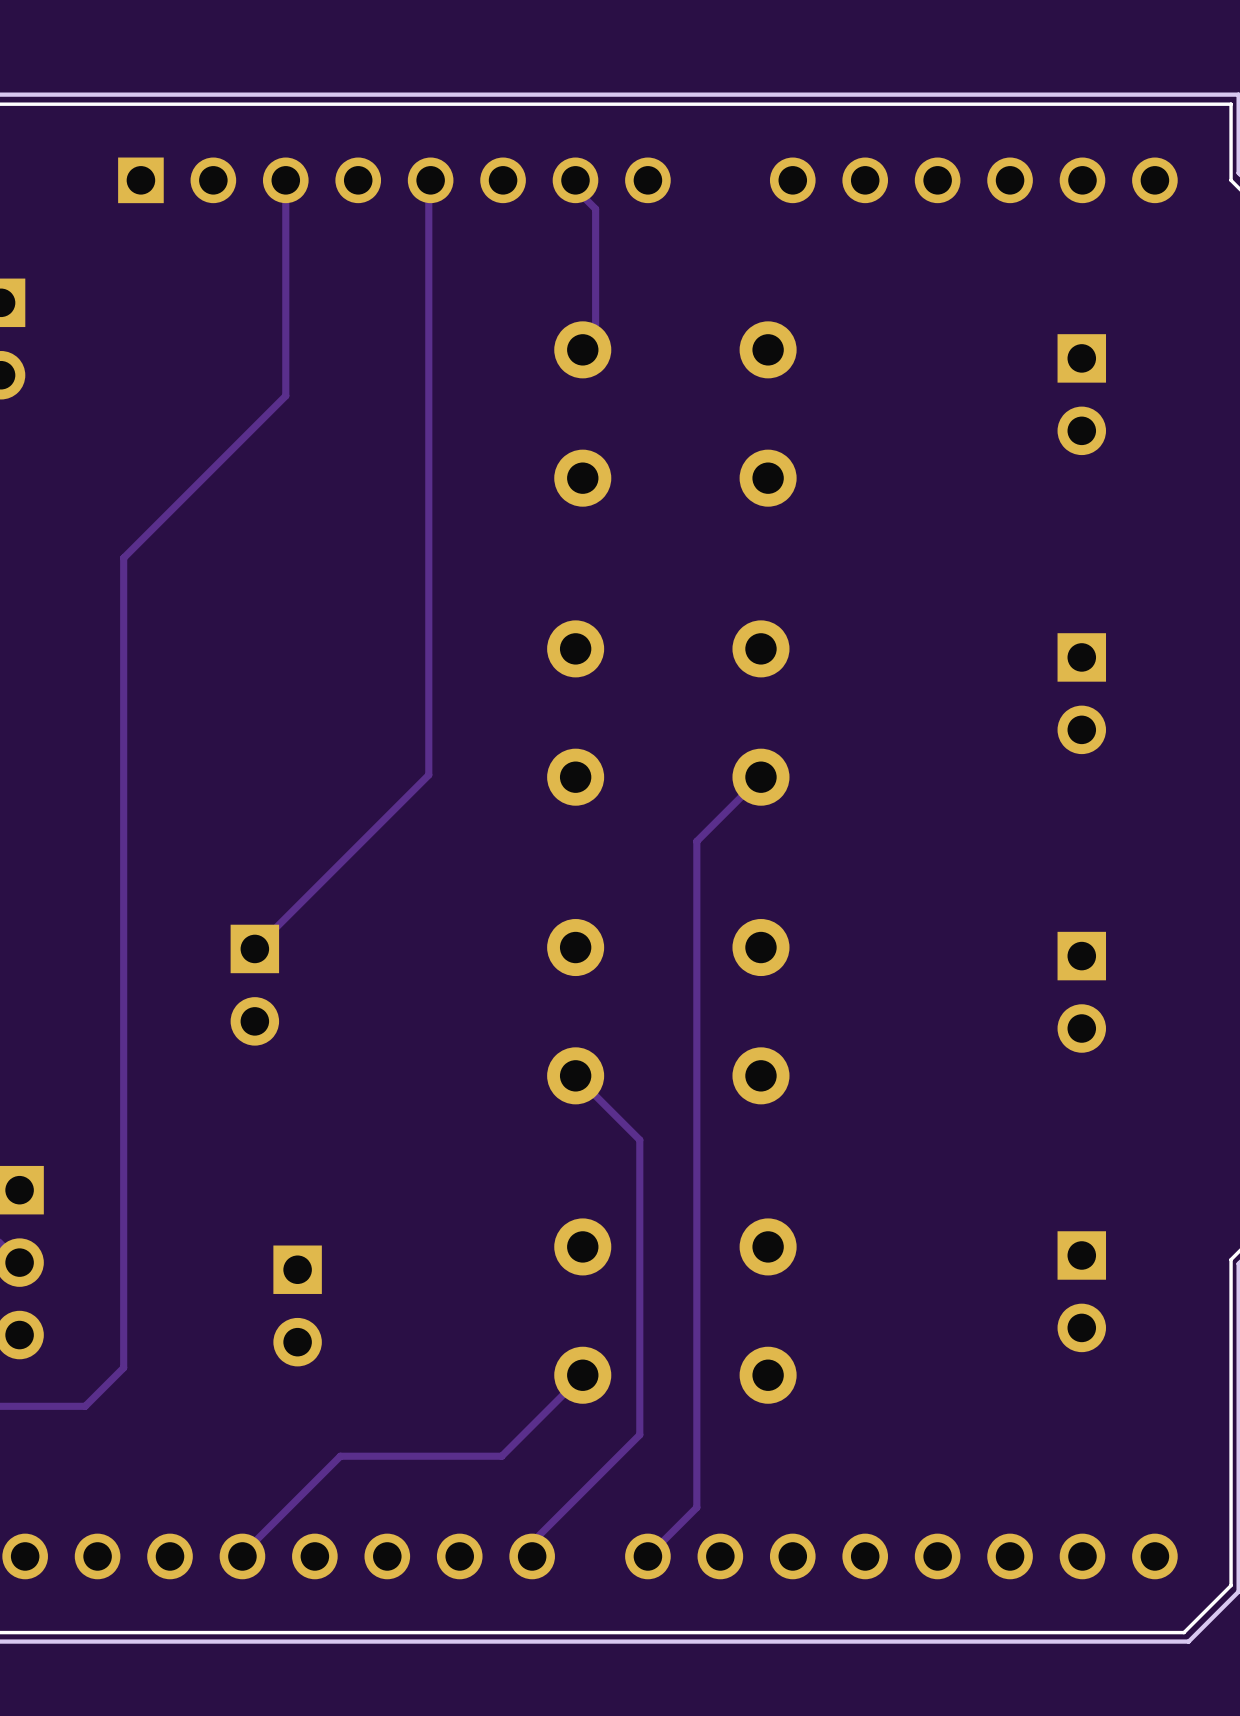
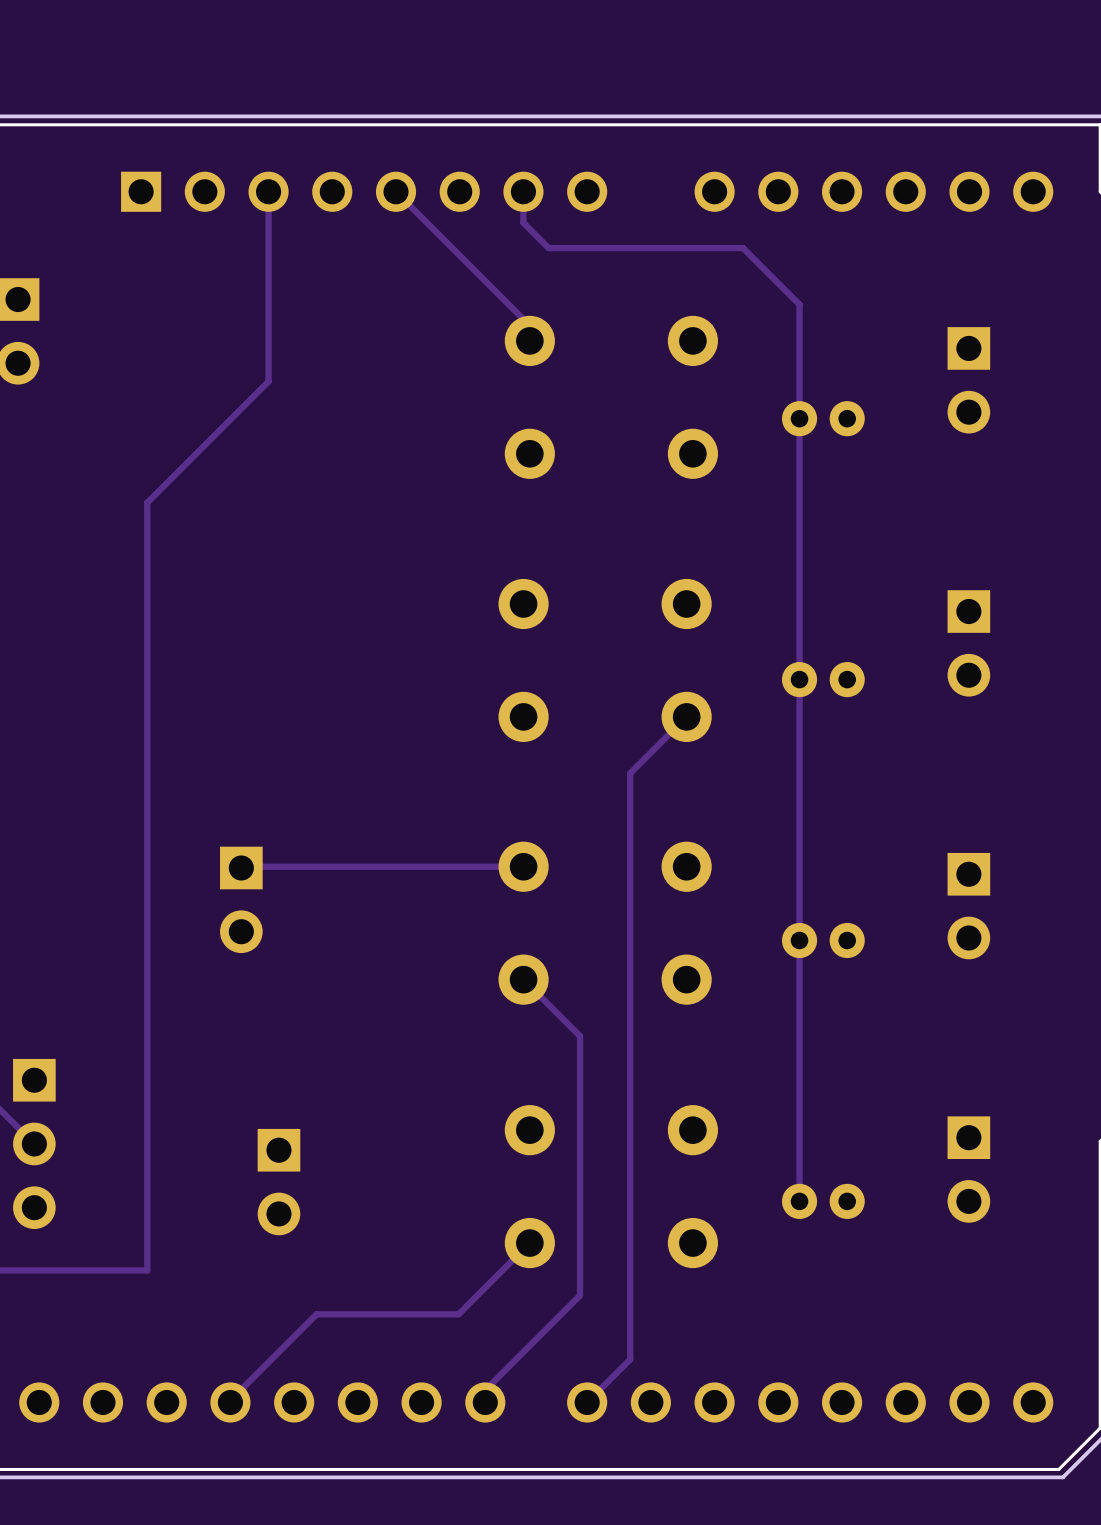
track: (430, 180) (428, 182) (428, 775) (256, 947) -> (396, 191) (529, 325)
track: (575, 180) (565, 181) (568, 181) (595, 209) (595, 349) -> (523, 191) (523, 222) (548, 248) (743, 248) (799, 304) (799, 1201)
part: none -> (823, 418)
track: (147, 533) (123, 558) (123, 1367) (85, 1406) -> (147, 502) (147, 1270) (92, 1270)
part: none -> (823, 679)
track: none -> (523, 866) (242, 866)
part: none -> (823, 940)
part: none -> (823, 1201)

